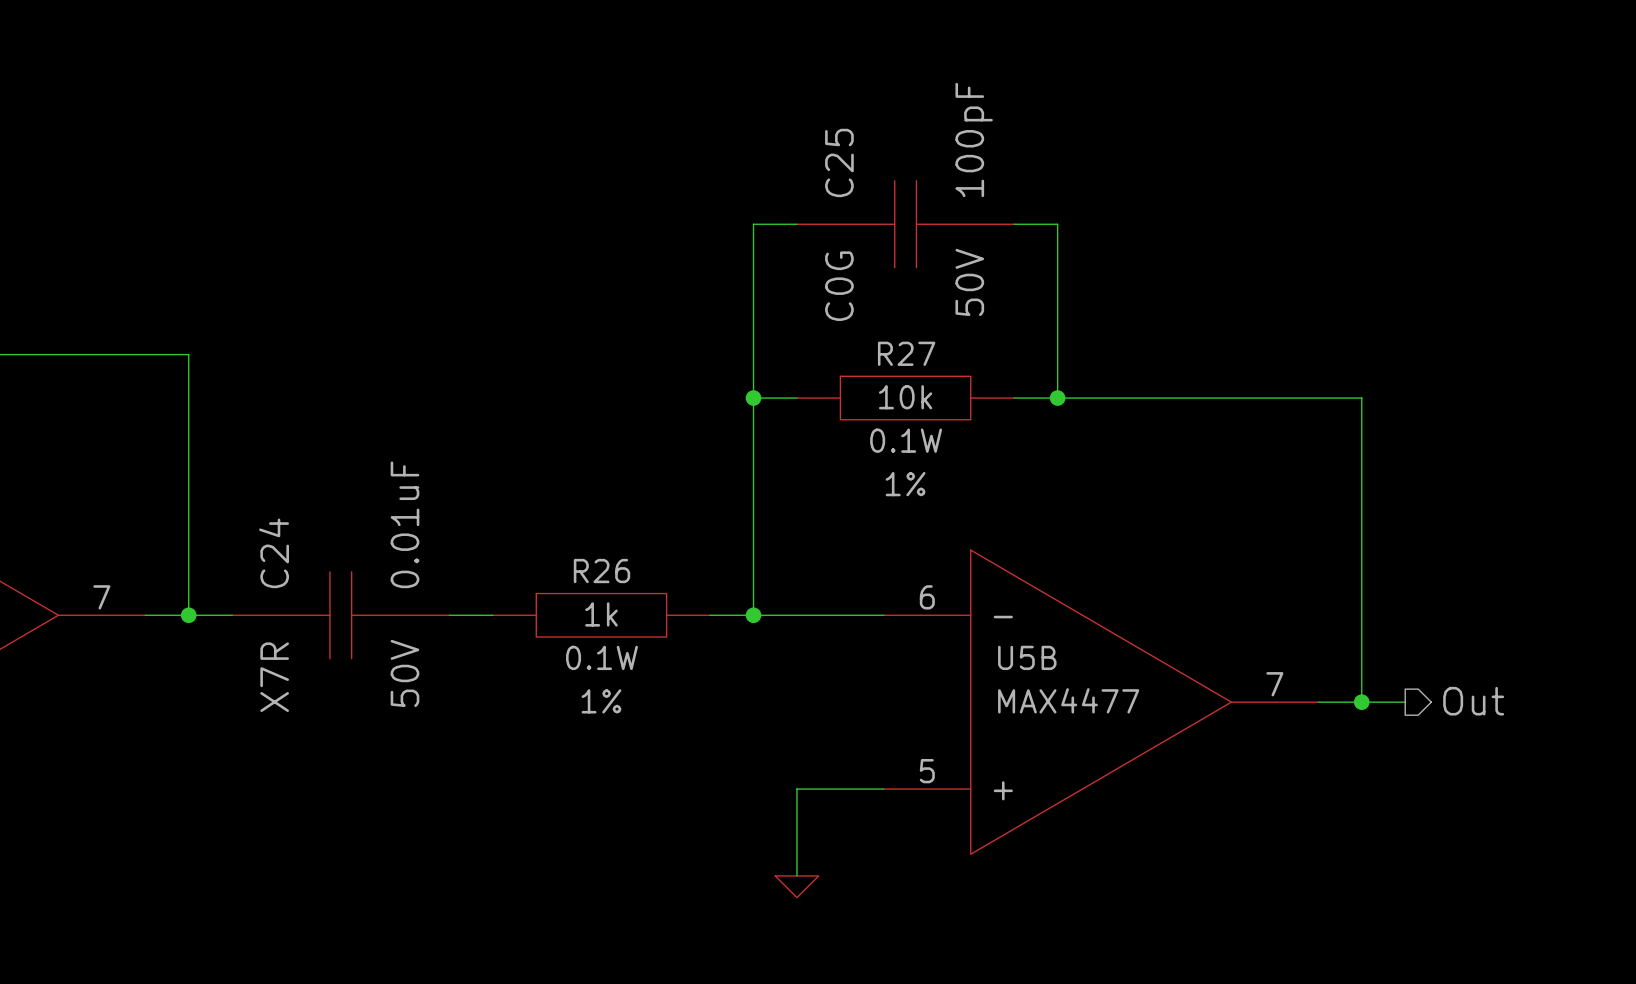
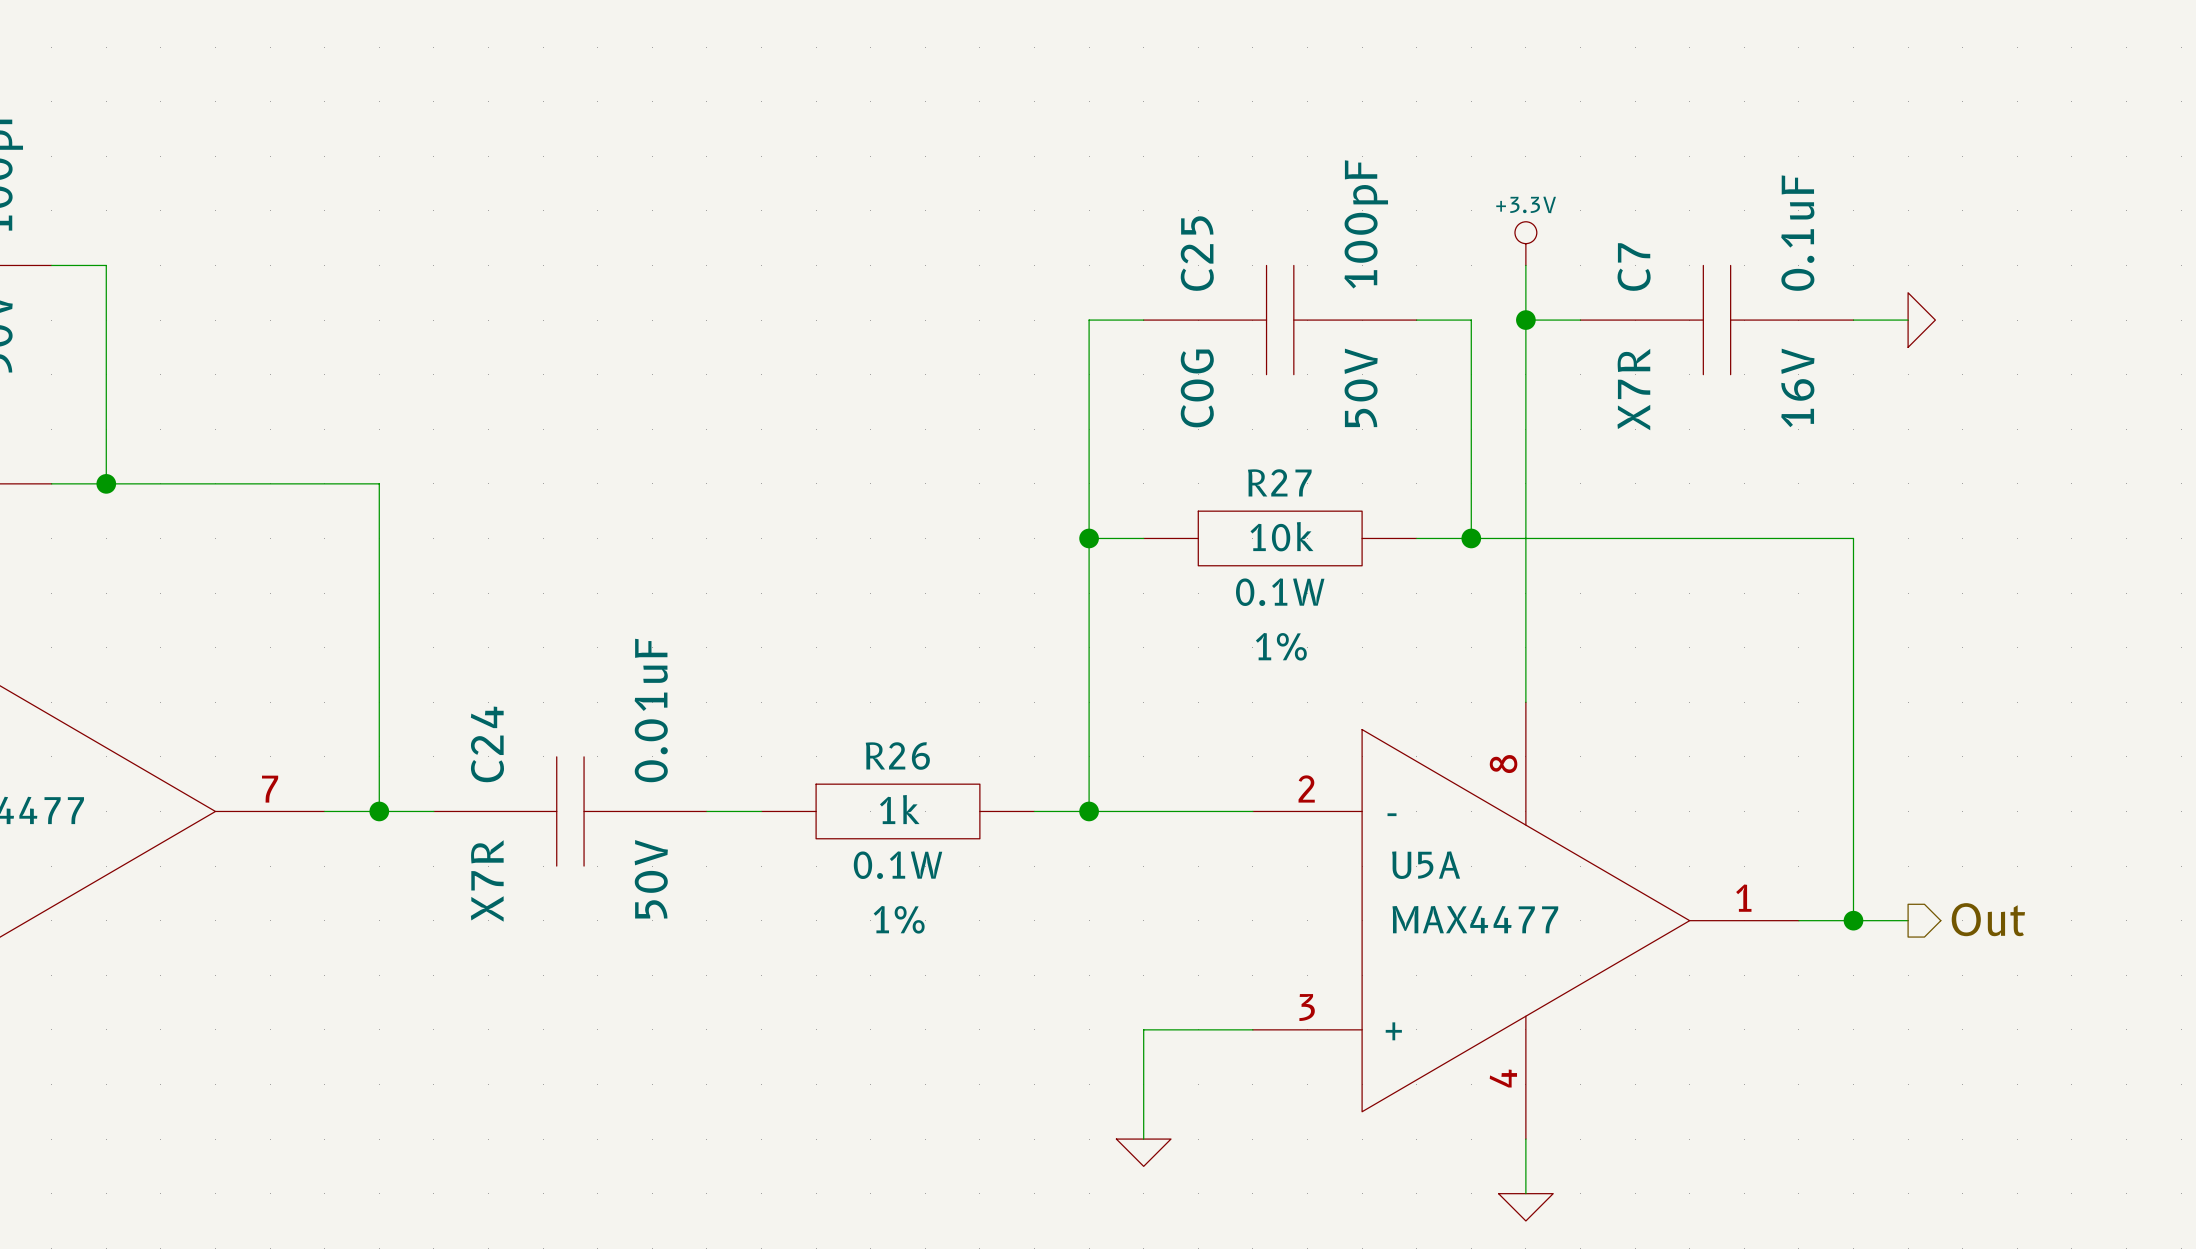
power symbol: none -> +3.3V (1525, 243)
wire: none -> (1525, 265) (1525, 702)
wire: none -> (1525, 320) (1580, 320)
junction: none -> (1525, 320)
C7: none -> 0.1uF (1716, 320)
wire: none -> (1853, 320) (1908, 320)
power symbol: none -> (1921, 320)
U5B: MAX4477 (1101, 702) -> none
U5A: none -> MAX4477 (1525, 920)
wire: none -> (1525, 1139) (1525, 1193)
power symbol: none -> (1525, 1207)

